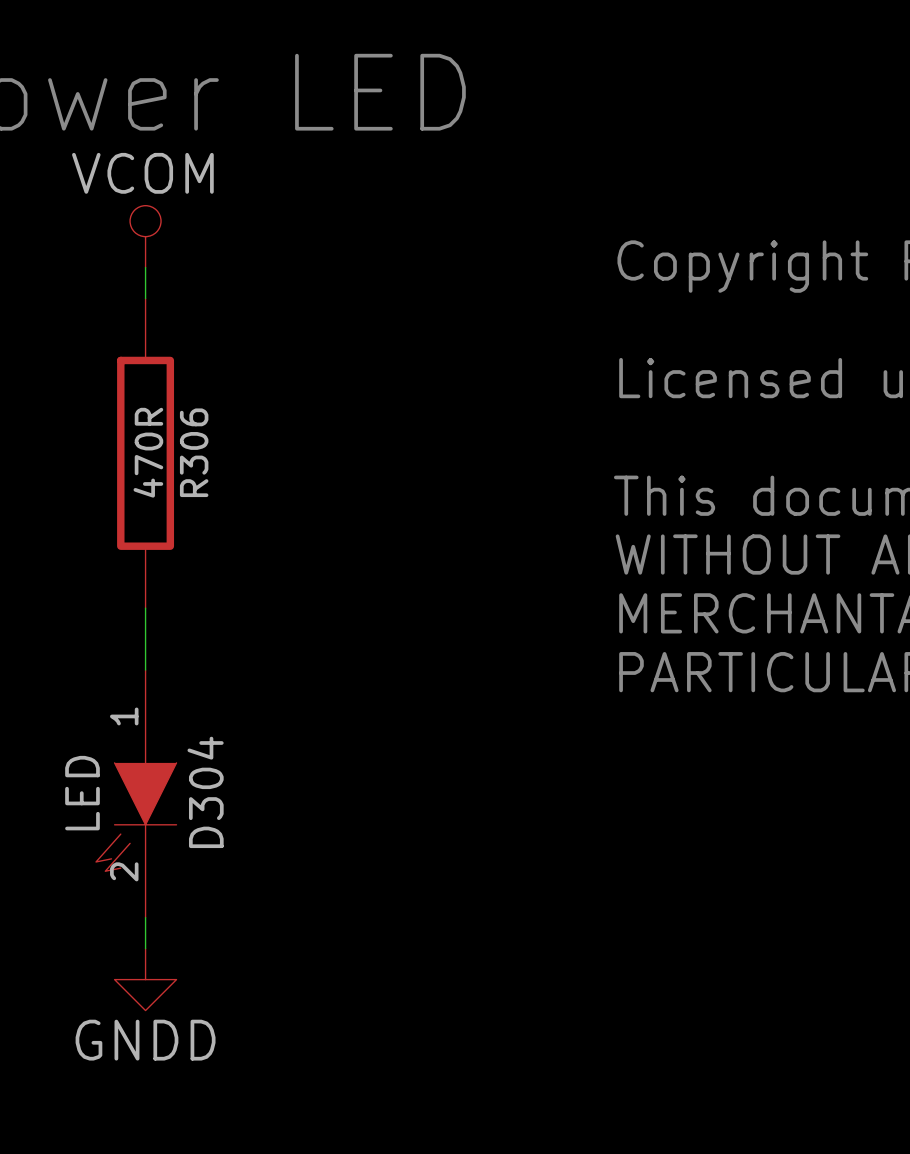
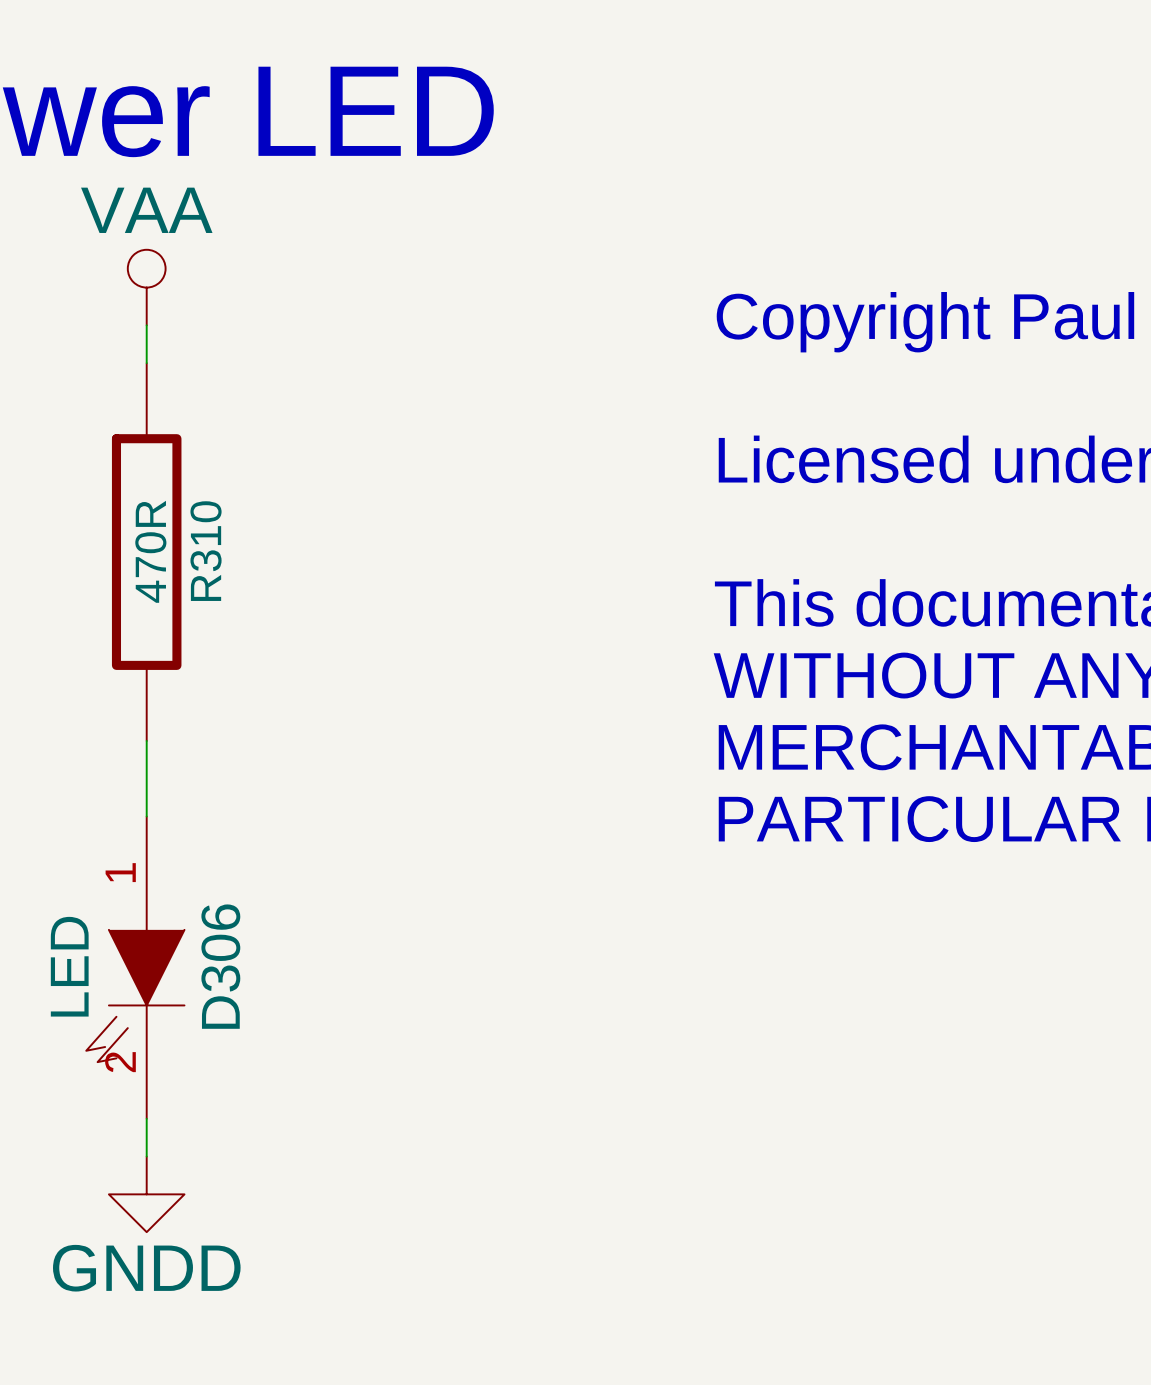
power symbol: VCOM (145, 236) -> VAA (146, 287)
R306 name: R306 (194, 452) -> R310 (206, 551)
D304 name: D304 (205, 792) -> D306 (220, 966)

